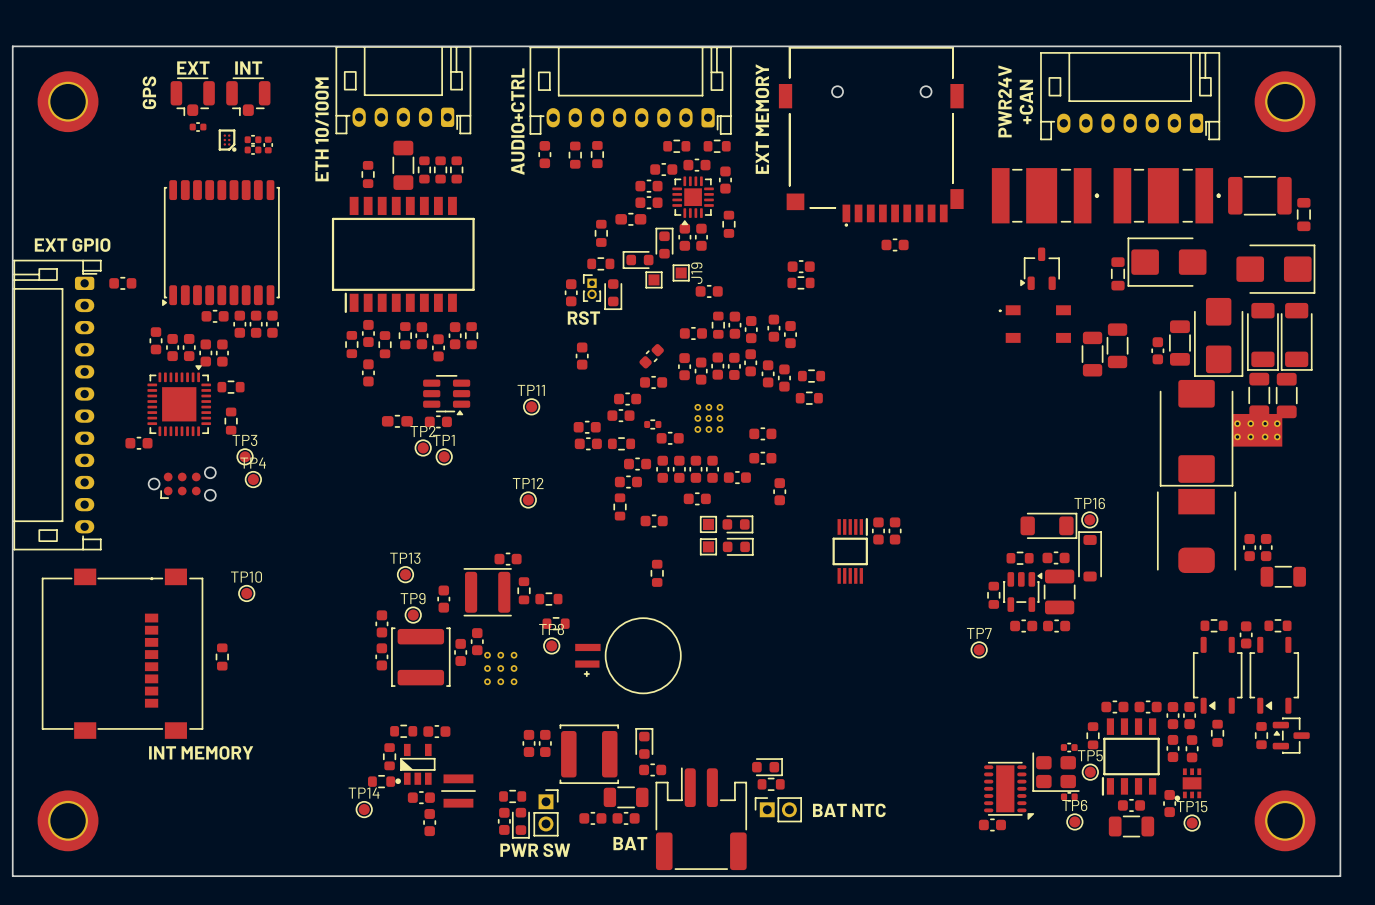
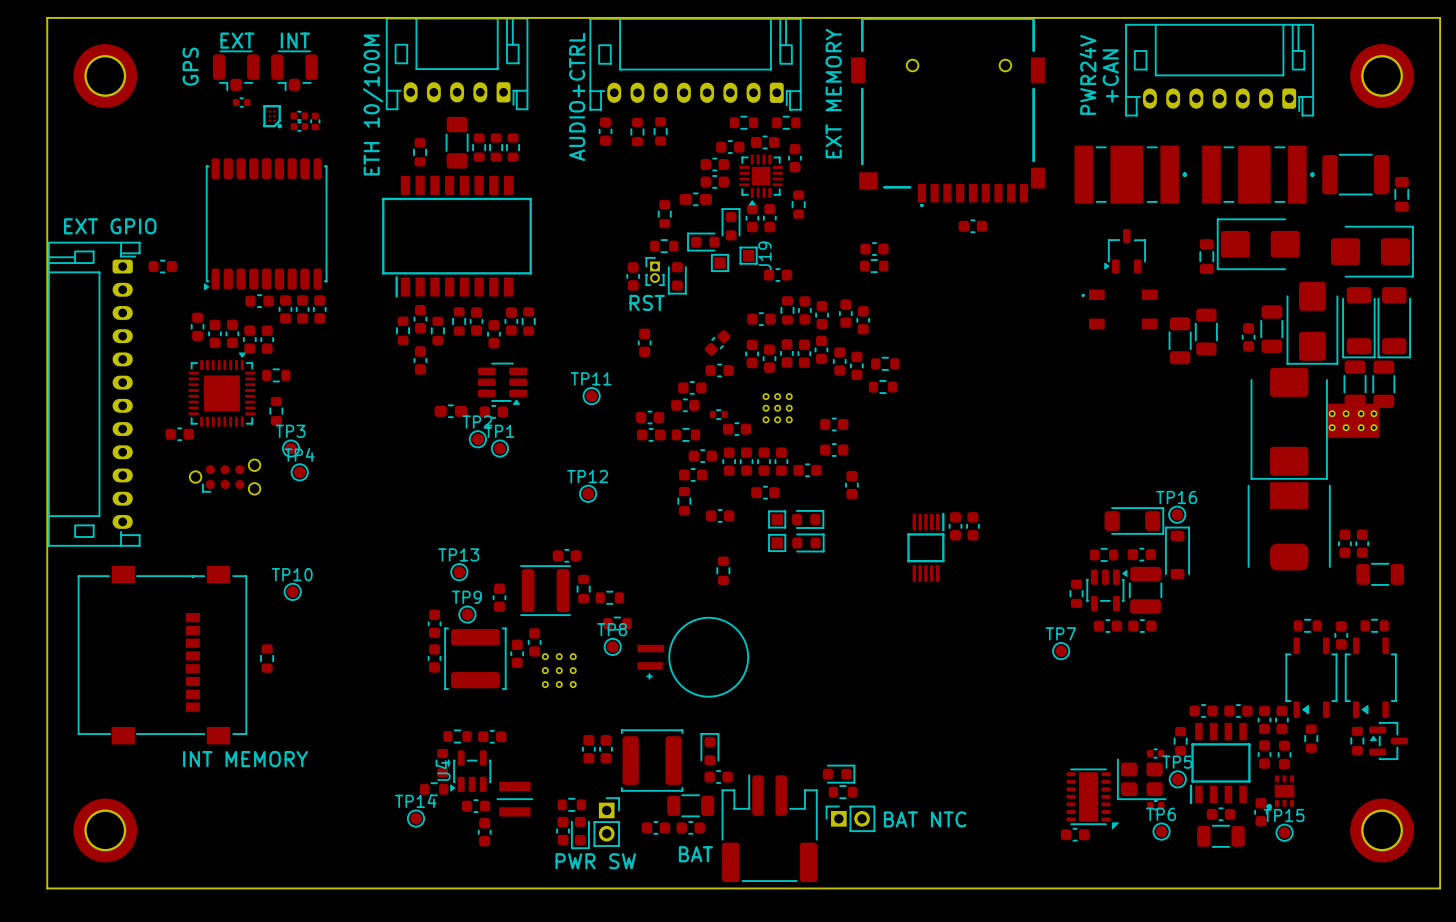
part: (415, 764) -> none
U4: none -> (470, 771)

